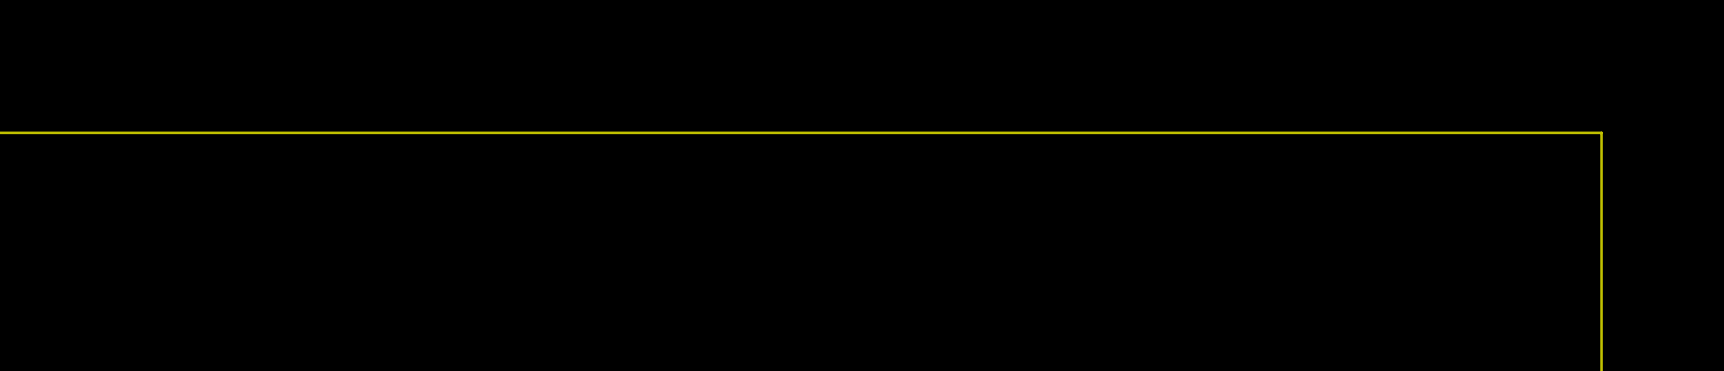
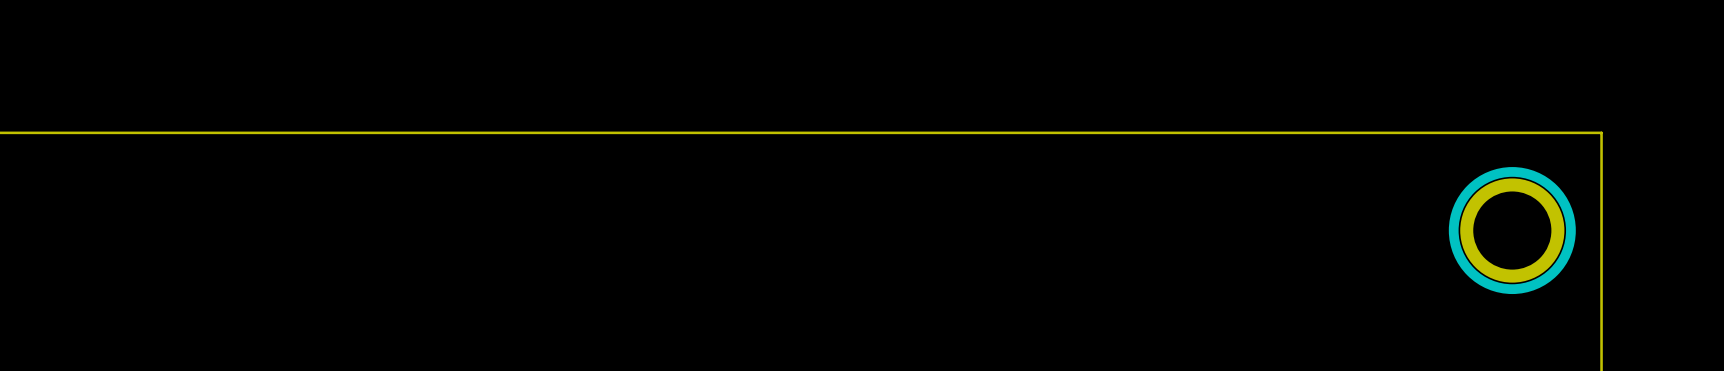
part: none -> (1512, 230)

